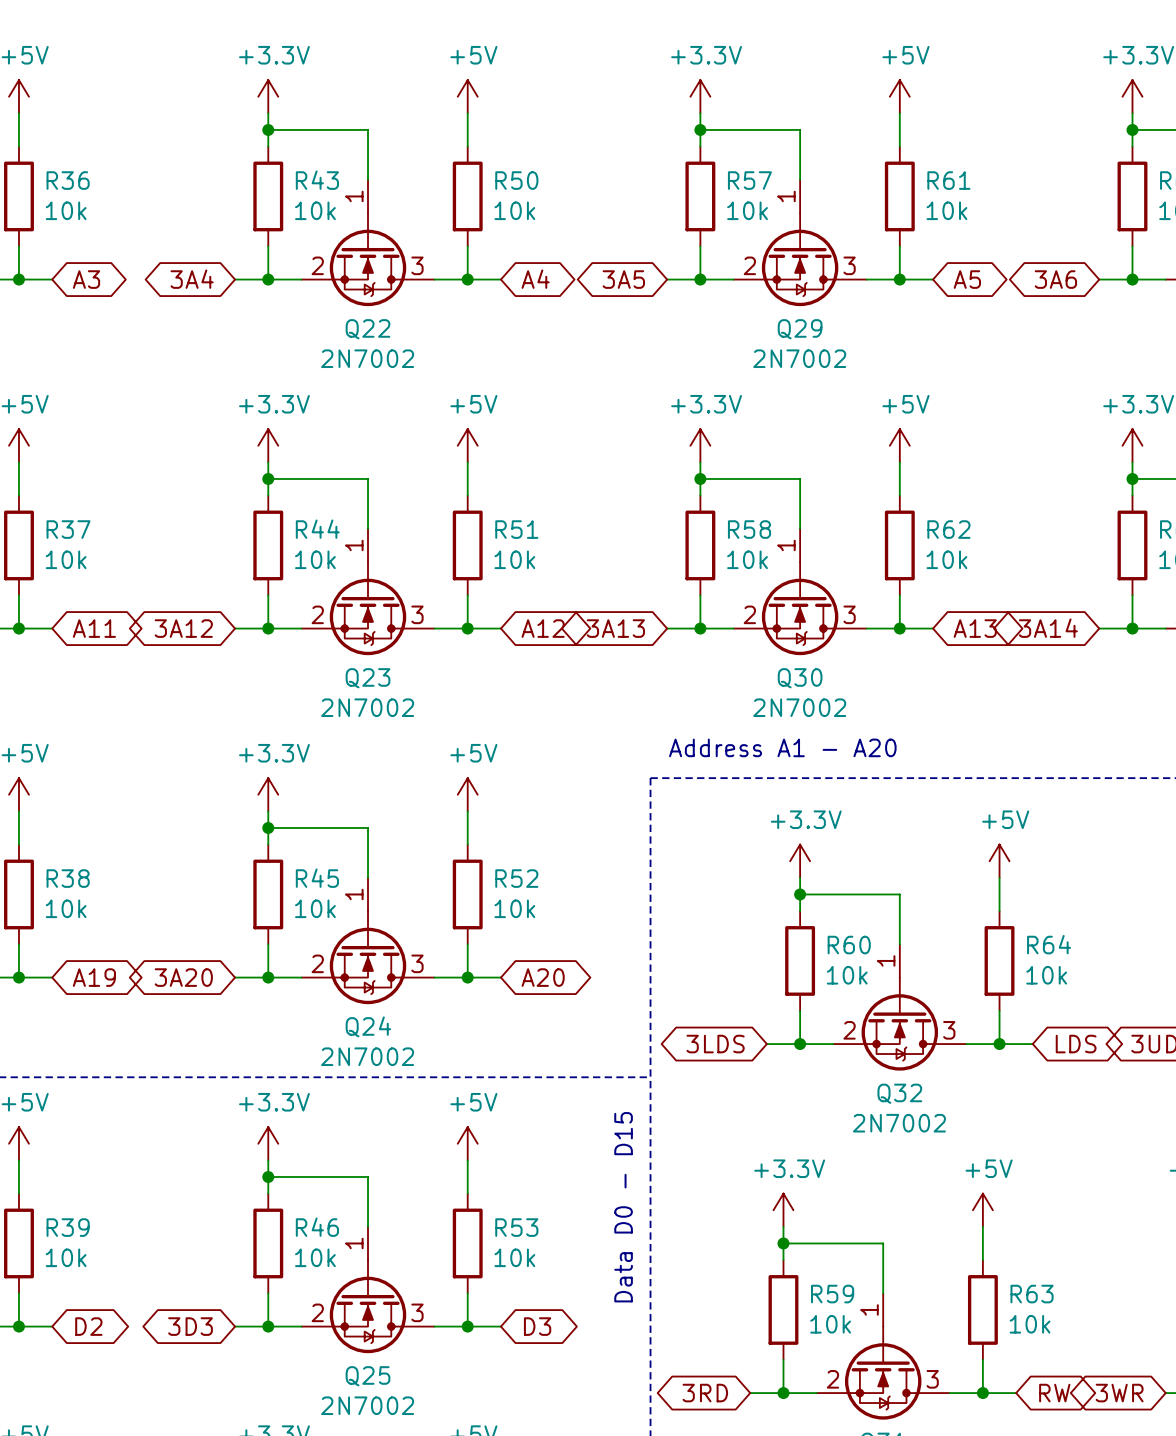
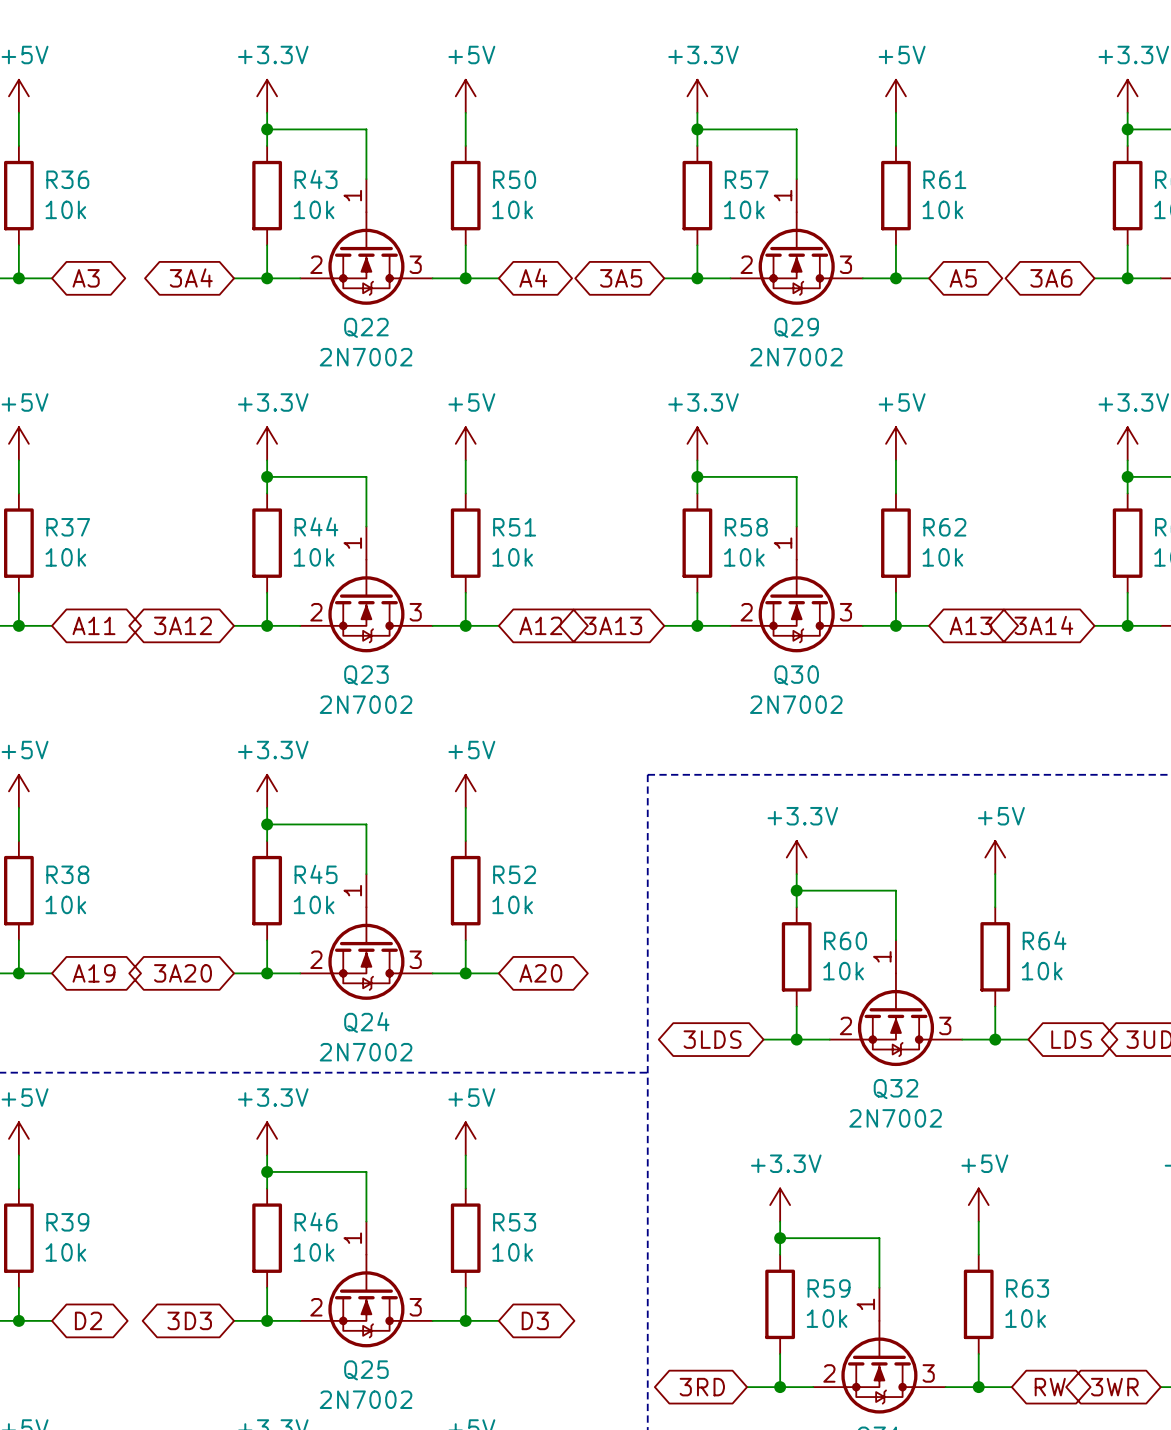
text: Address A1 - A20 (782, 747) -> none
text: Data D0 - D15 (623, 1207) -> none

